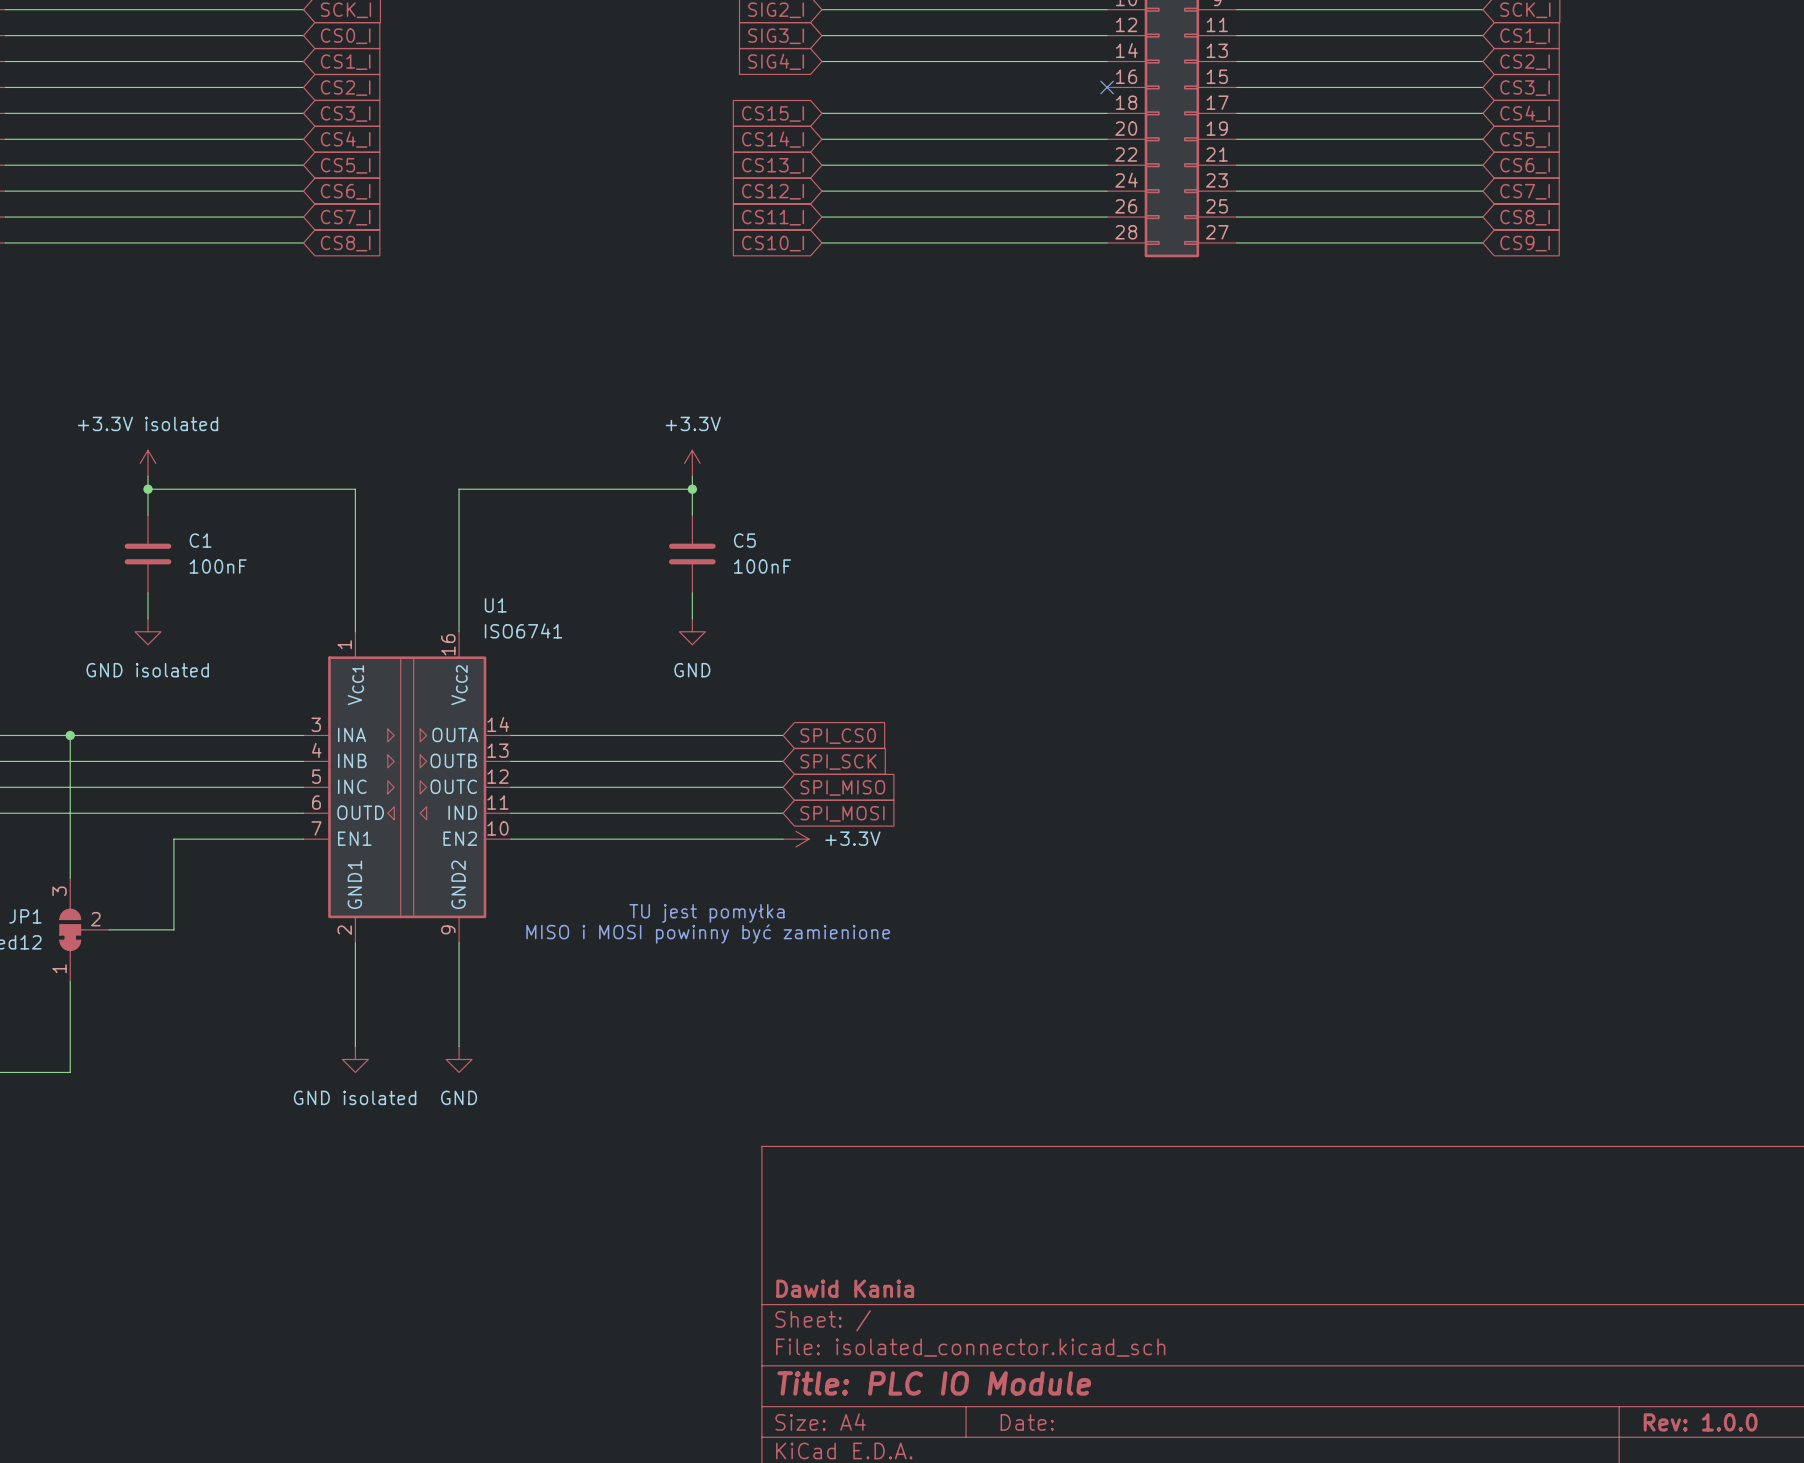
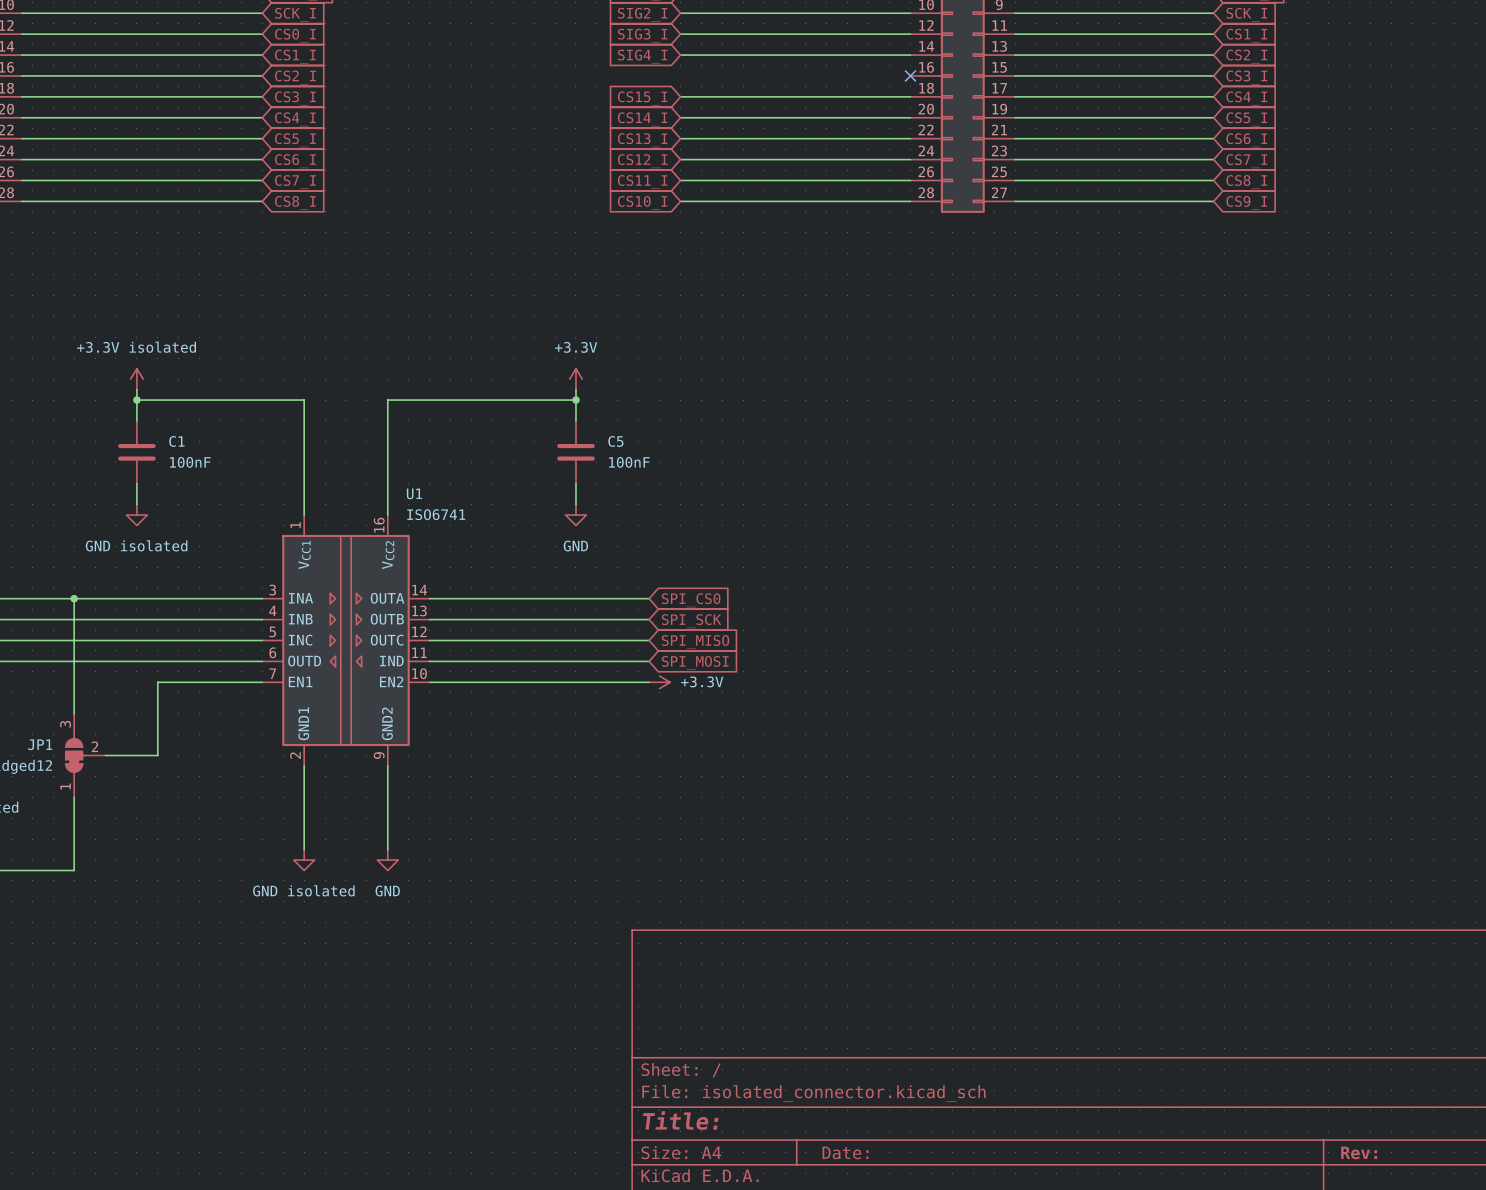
text: TU jest pomyłka (706, 913) -> none
text: MISO i MOSI powinny być zamienione (708, 933) -> none
title block: Dawid Kania (845, 1288) -> none
title block: Title: PLC IO Module (934, 1383) -> Title: (680, 1120)
title block: Rev: 1.0.0 (1700, 1422) -> Rev: (1359, 1152)

